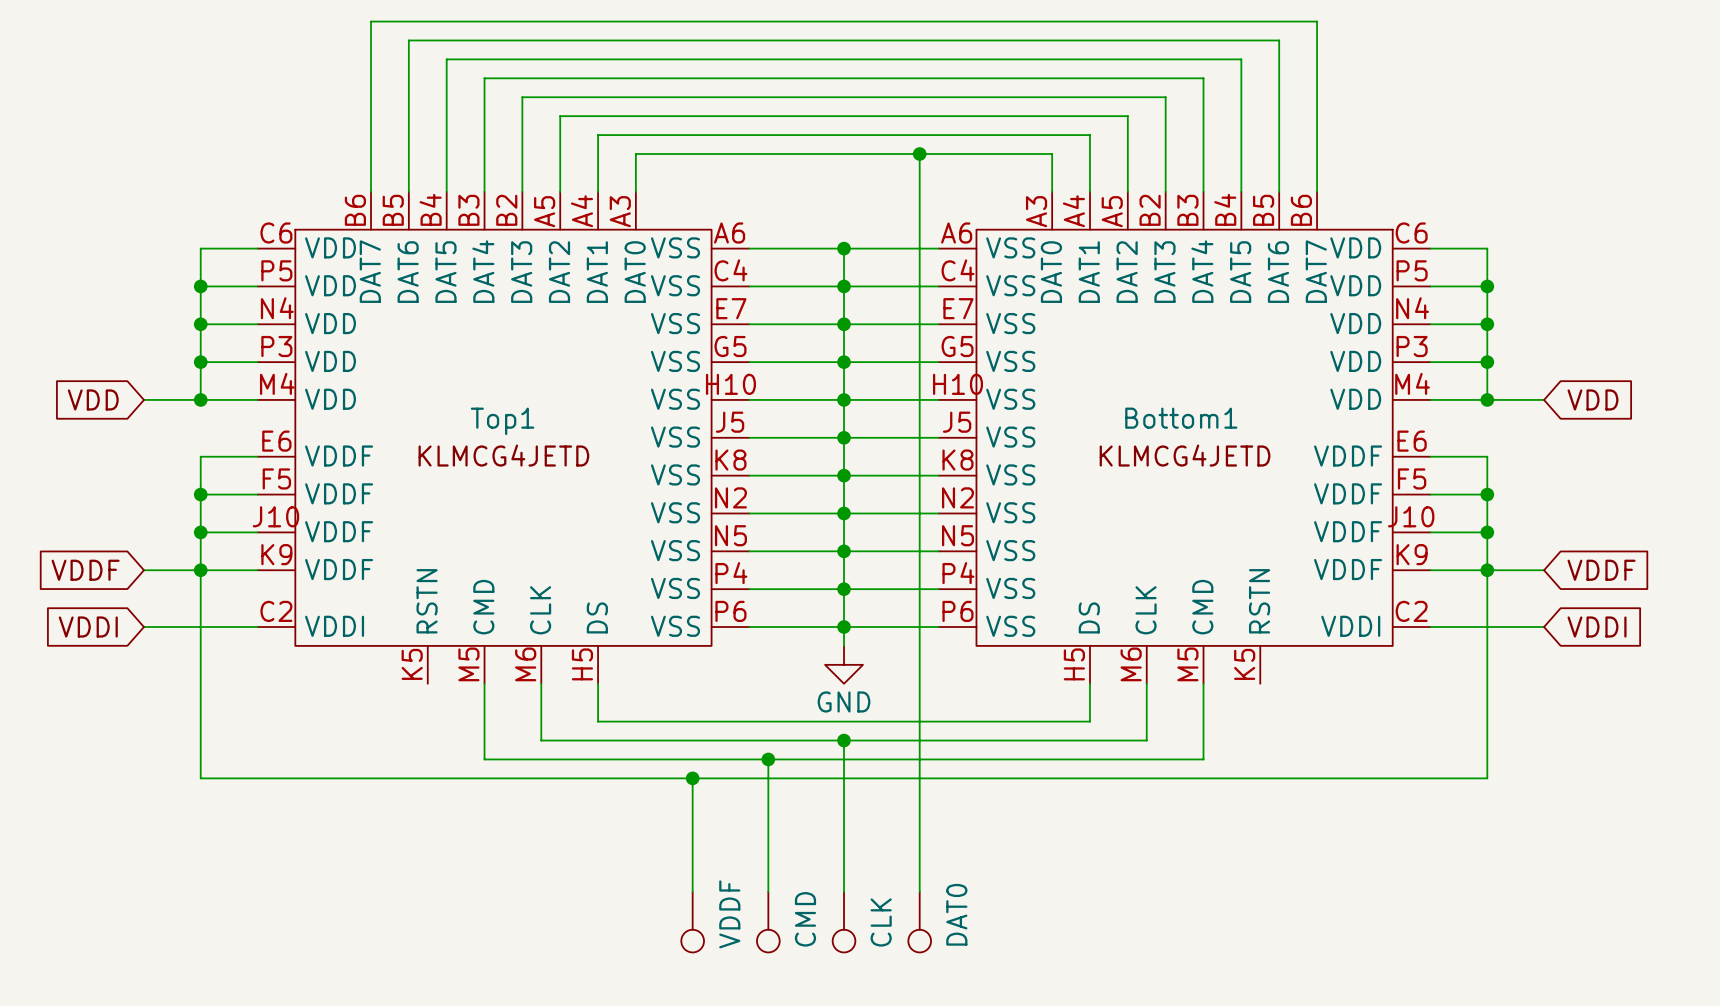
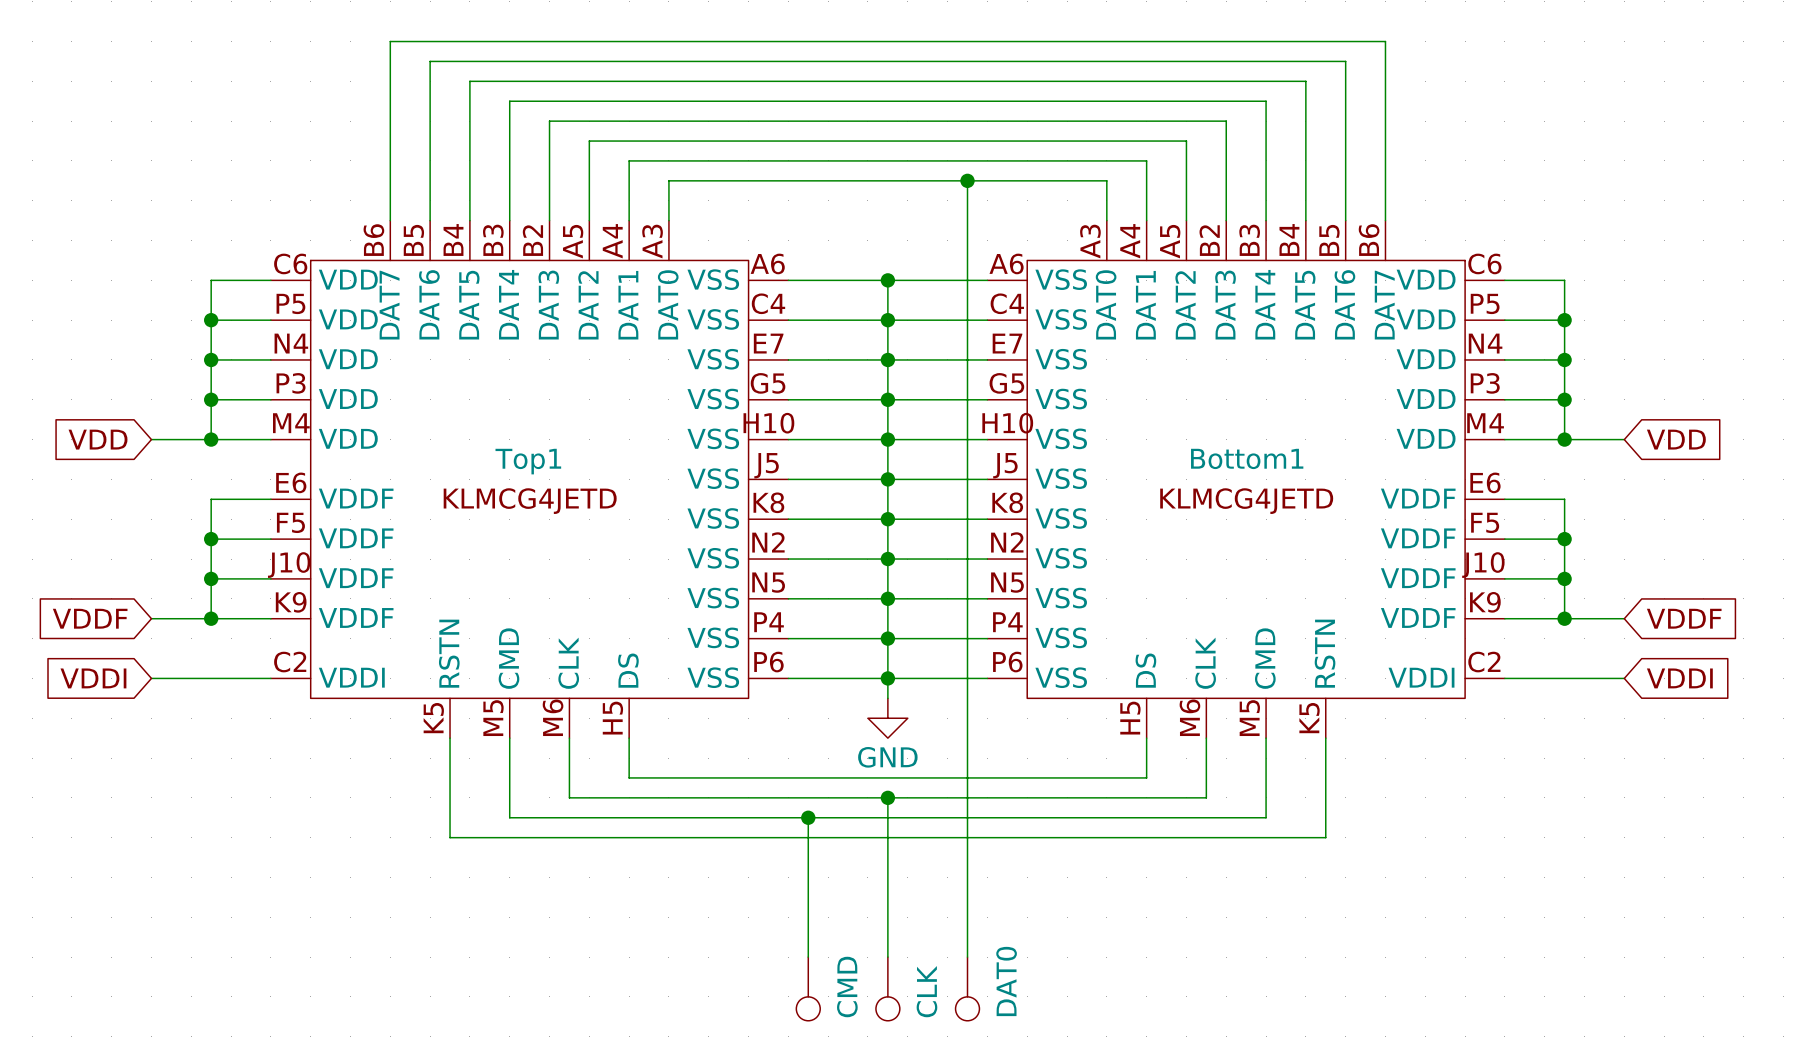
wire: (200, 570) (200, 778) (427, 778) -> (450, 738) (450, 837)
wire: (1487, 570) (1487, 778) (1260, 778) -> (1325, 738) (1325, 837)
wire: (692, 778) (692, 891) -> none
junction: (692, 778) -> none
part: VDDF (692, 922) -> none

